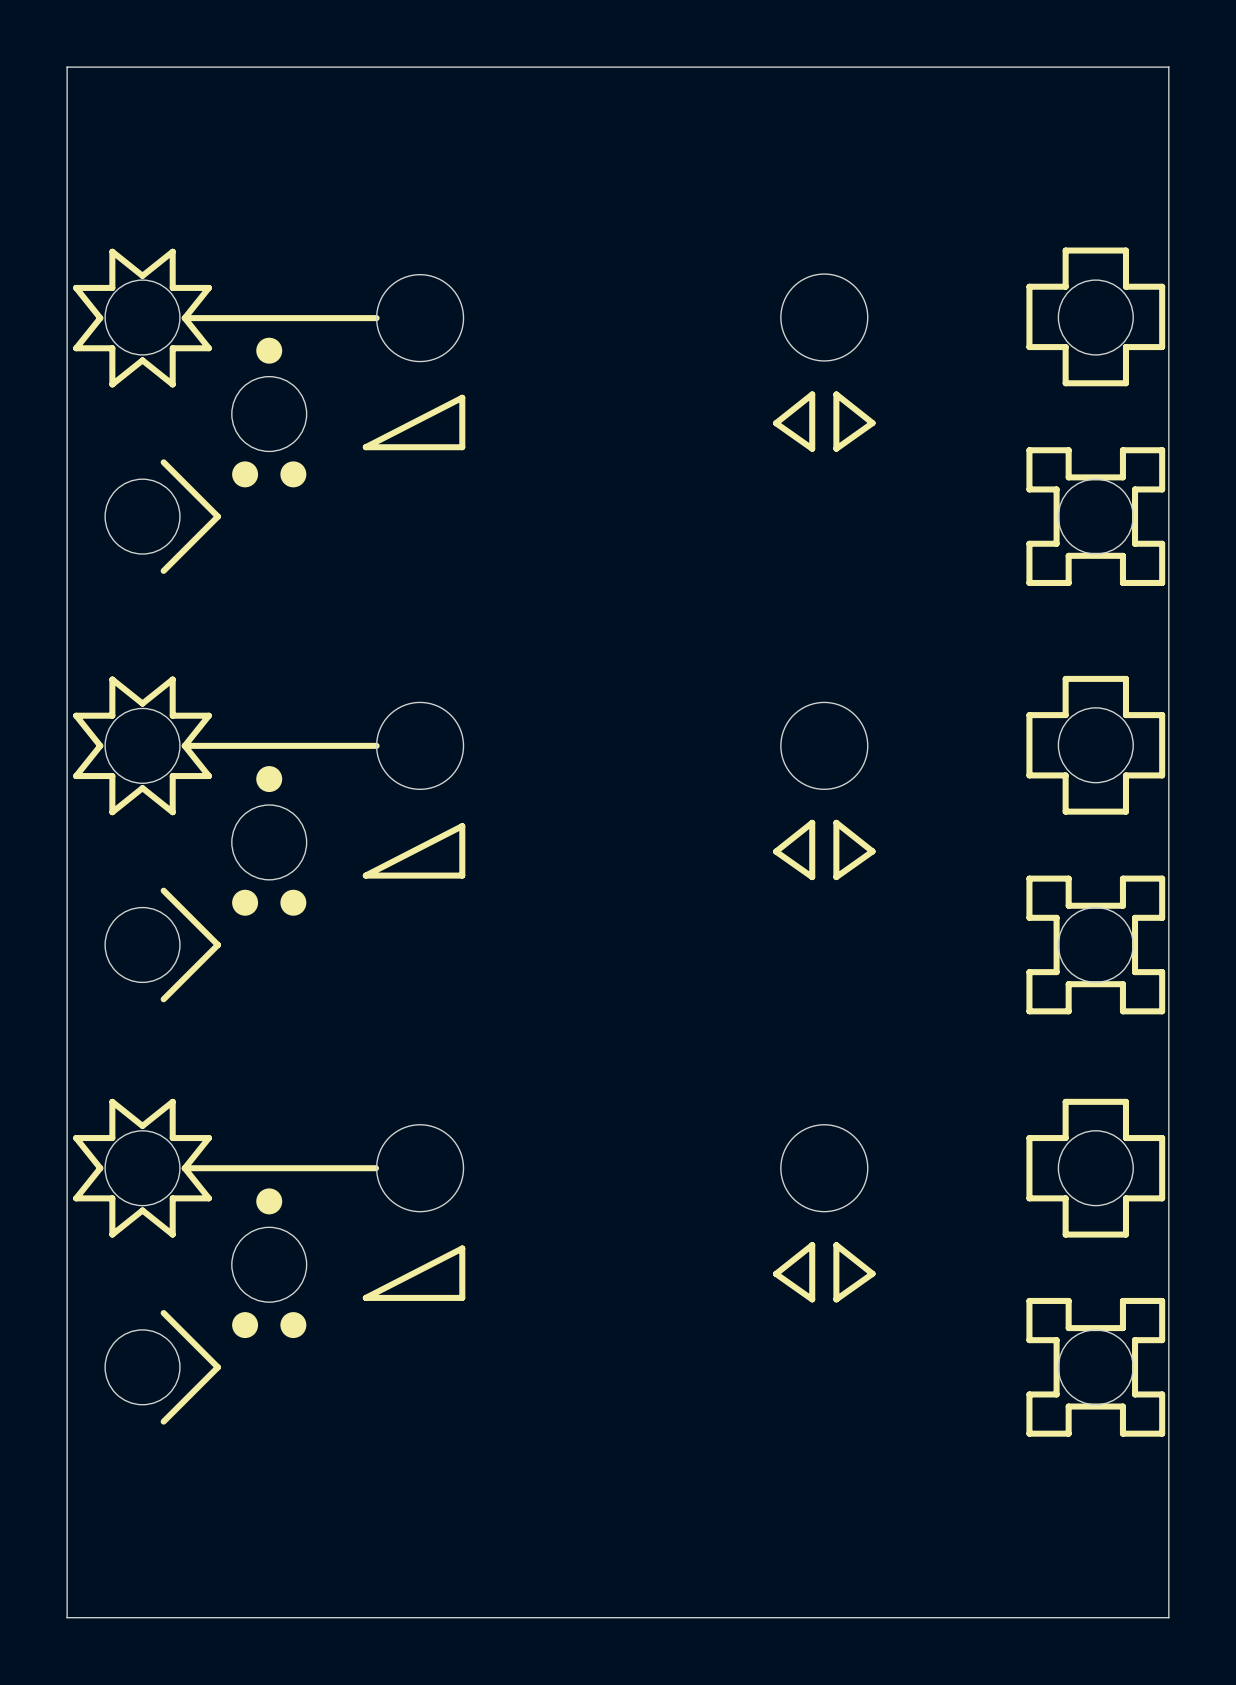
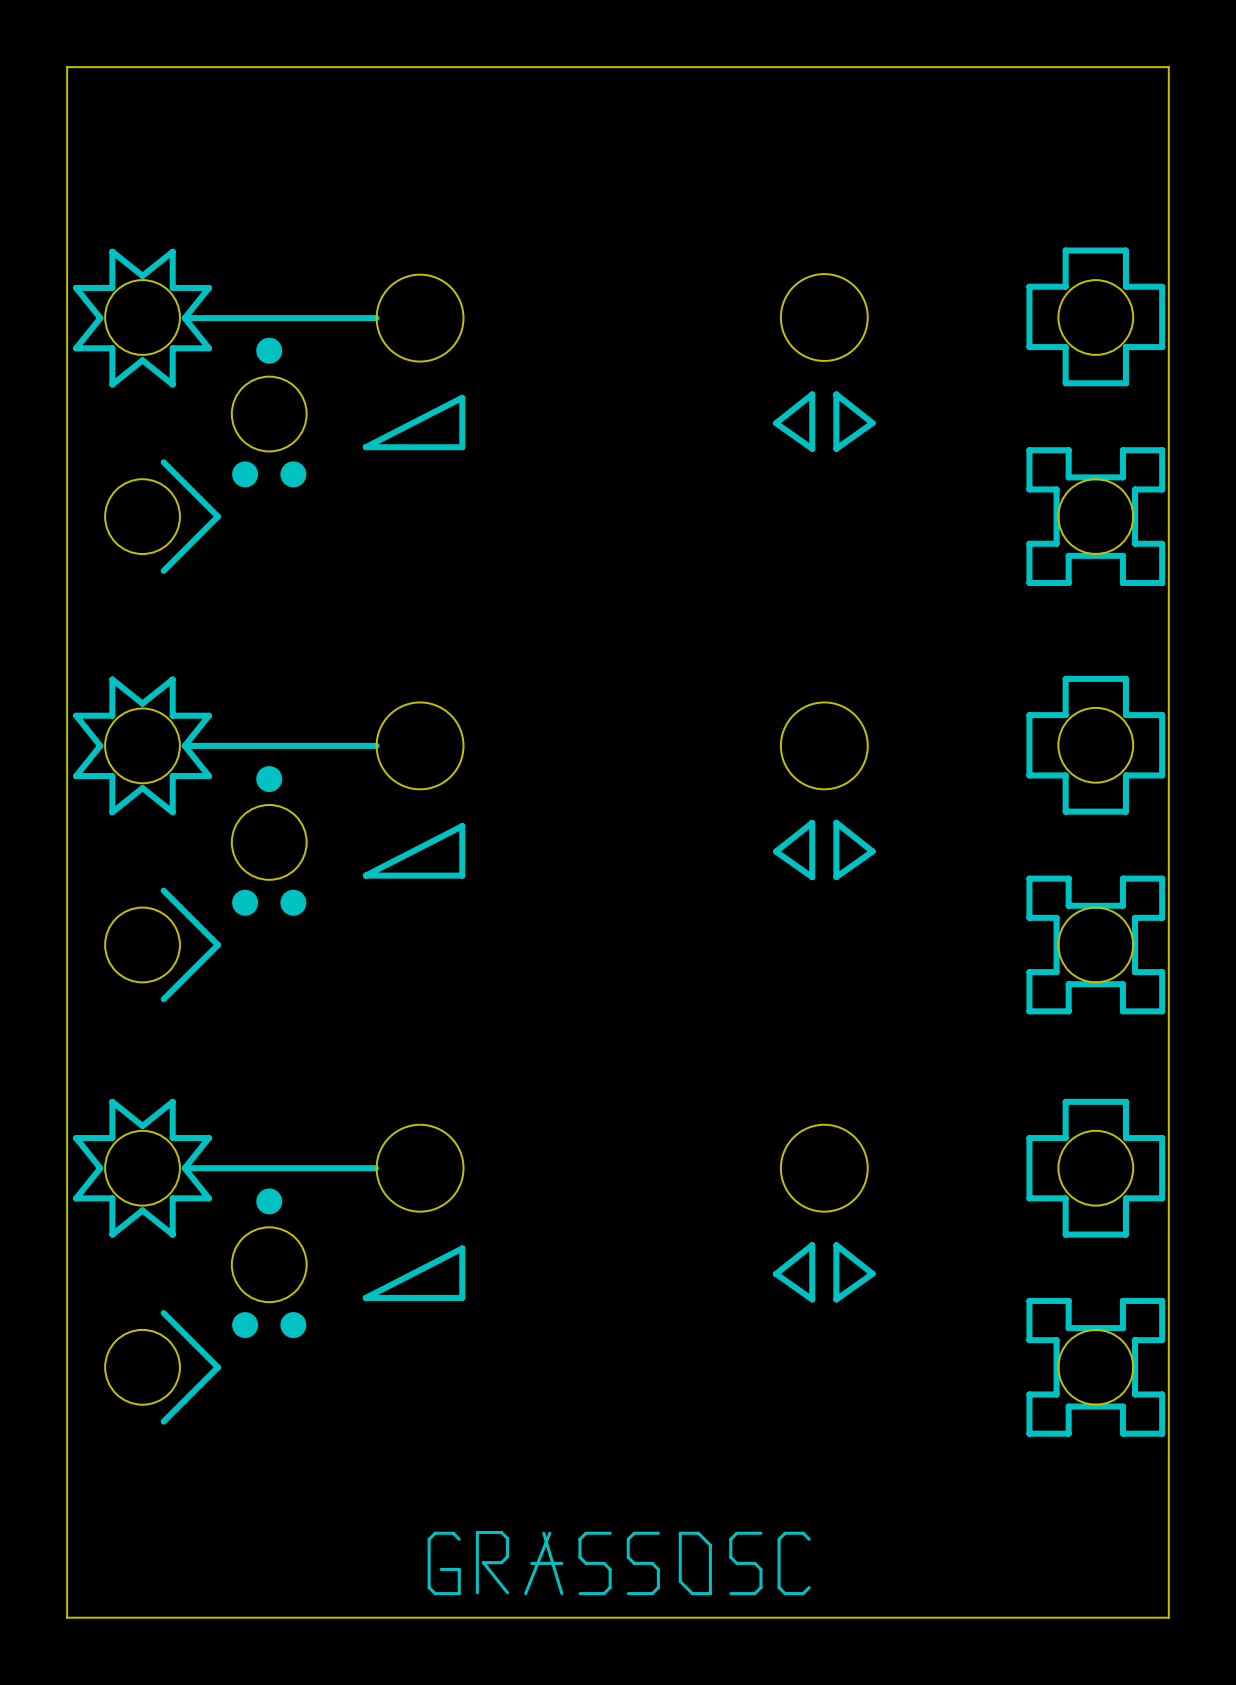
drawing: none -> [475, 1530, 510, 1595]
drawing: none -> [524, 1531, 564, 1596]
drawing: none -> [678, 1531, 712, 1596]
line: none -> (610, 1533) (585, 1533) (579, 1539) (579, 1557) (585, 1563) (604, 1563) (610, 1569) (610, 1587) (604, 1593) (579, 1593)
line: none -> (658, 1533) (634, 1533) (628, 1539) (628, 1557) (634, 1563) (652, 1563) (658, 1569) (658, 1587) (652, 1593) (628, 1593)
line: none -> (760, 1533) (736, 1533) (730, 1539) (730, 1557) (736, 1563) (754, 1563) (760, 1569) (760, 1587) (754, 1593) (730, 1593)
line: none -> (459, 1539) (453, 1533) (435, 1533) (429, 1539) (429, 1587) (435, 1593) (459, 1593) (459, 1569) (441, 1569)
line: none -> (809, 1539) (803, 1533) (785, 1533) (779, 1539) (779, 1587) (785, 1593) (803, 1593) (809, 1587)

